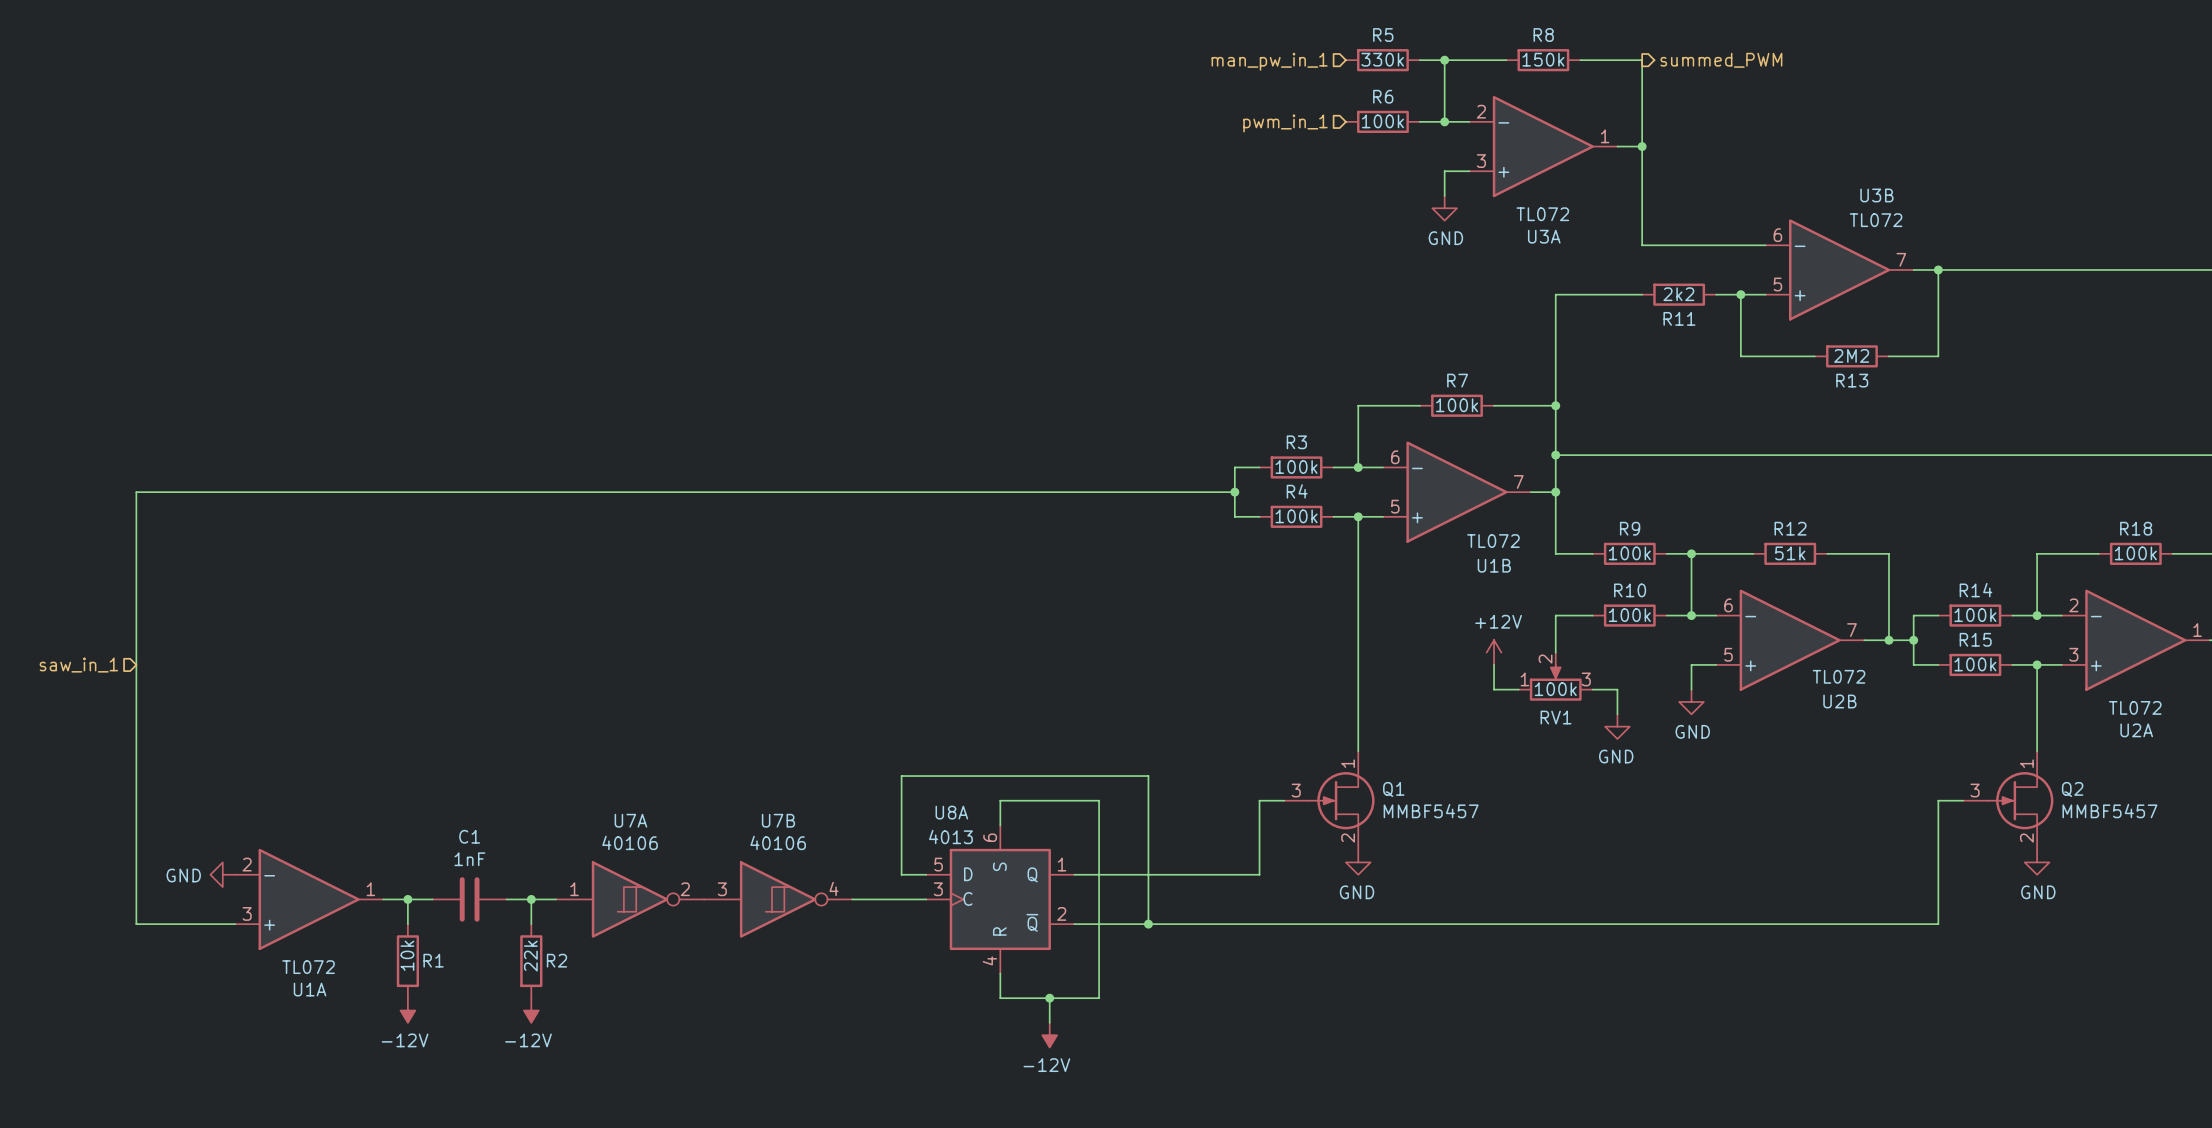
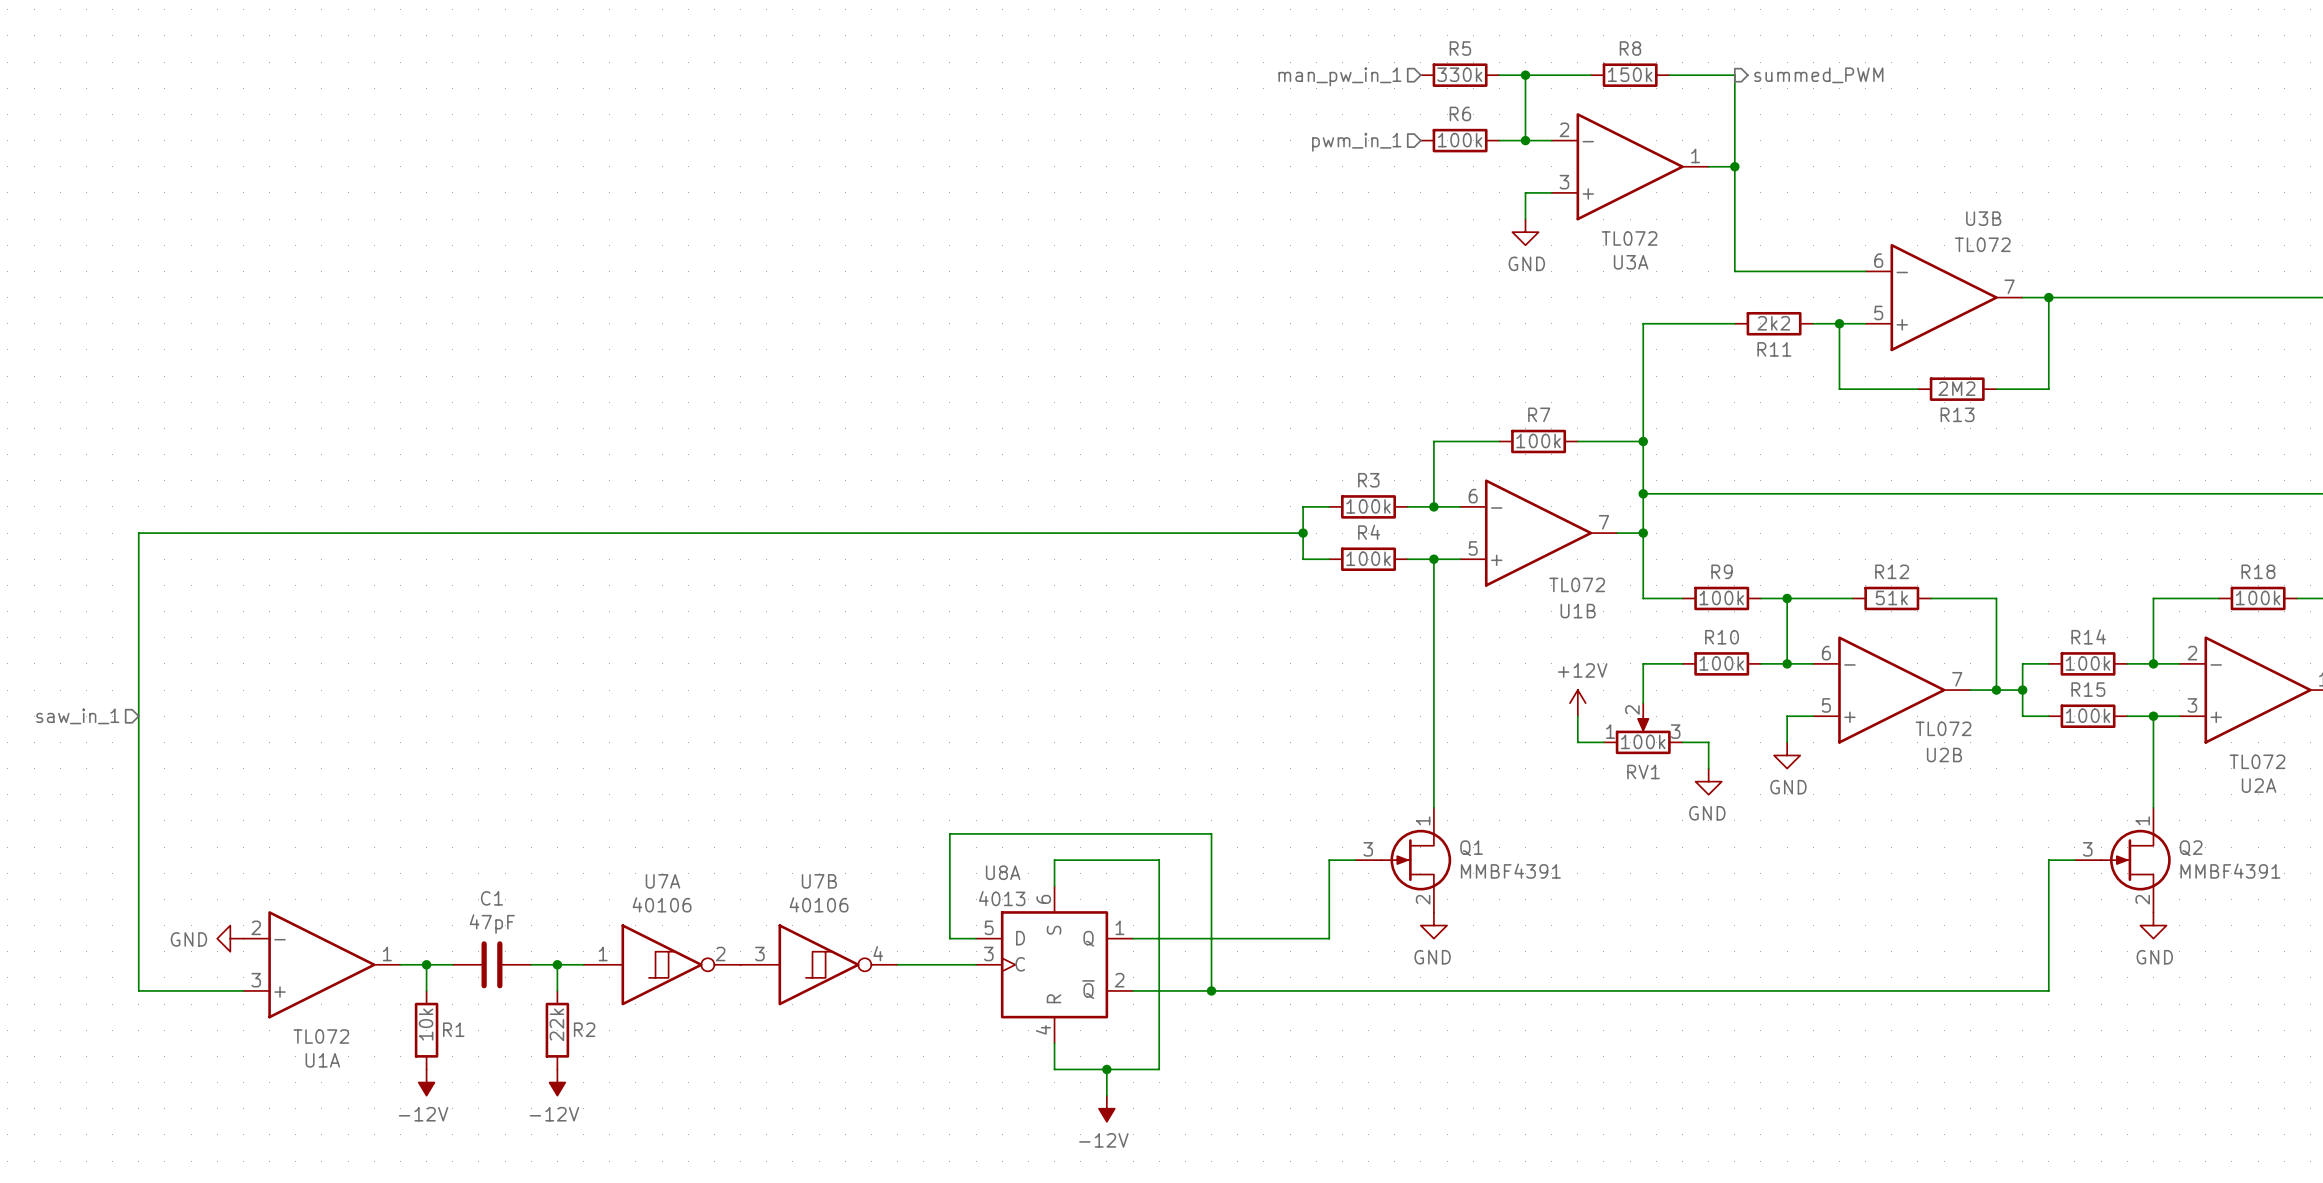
Q1 value: MMBF5457 (1431, 811) -> MMBF4391 (1510, 871)
Q2 value: MMBF5457 (2109, 811) -> MMBF4391 (2230, 871)
C1 value: 1nF (469, 859) -> 47pF (492, 924)

